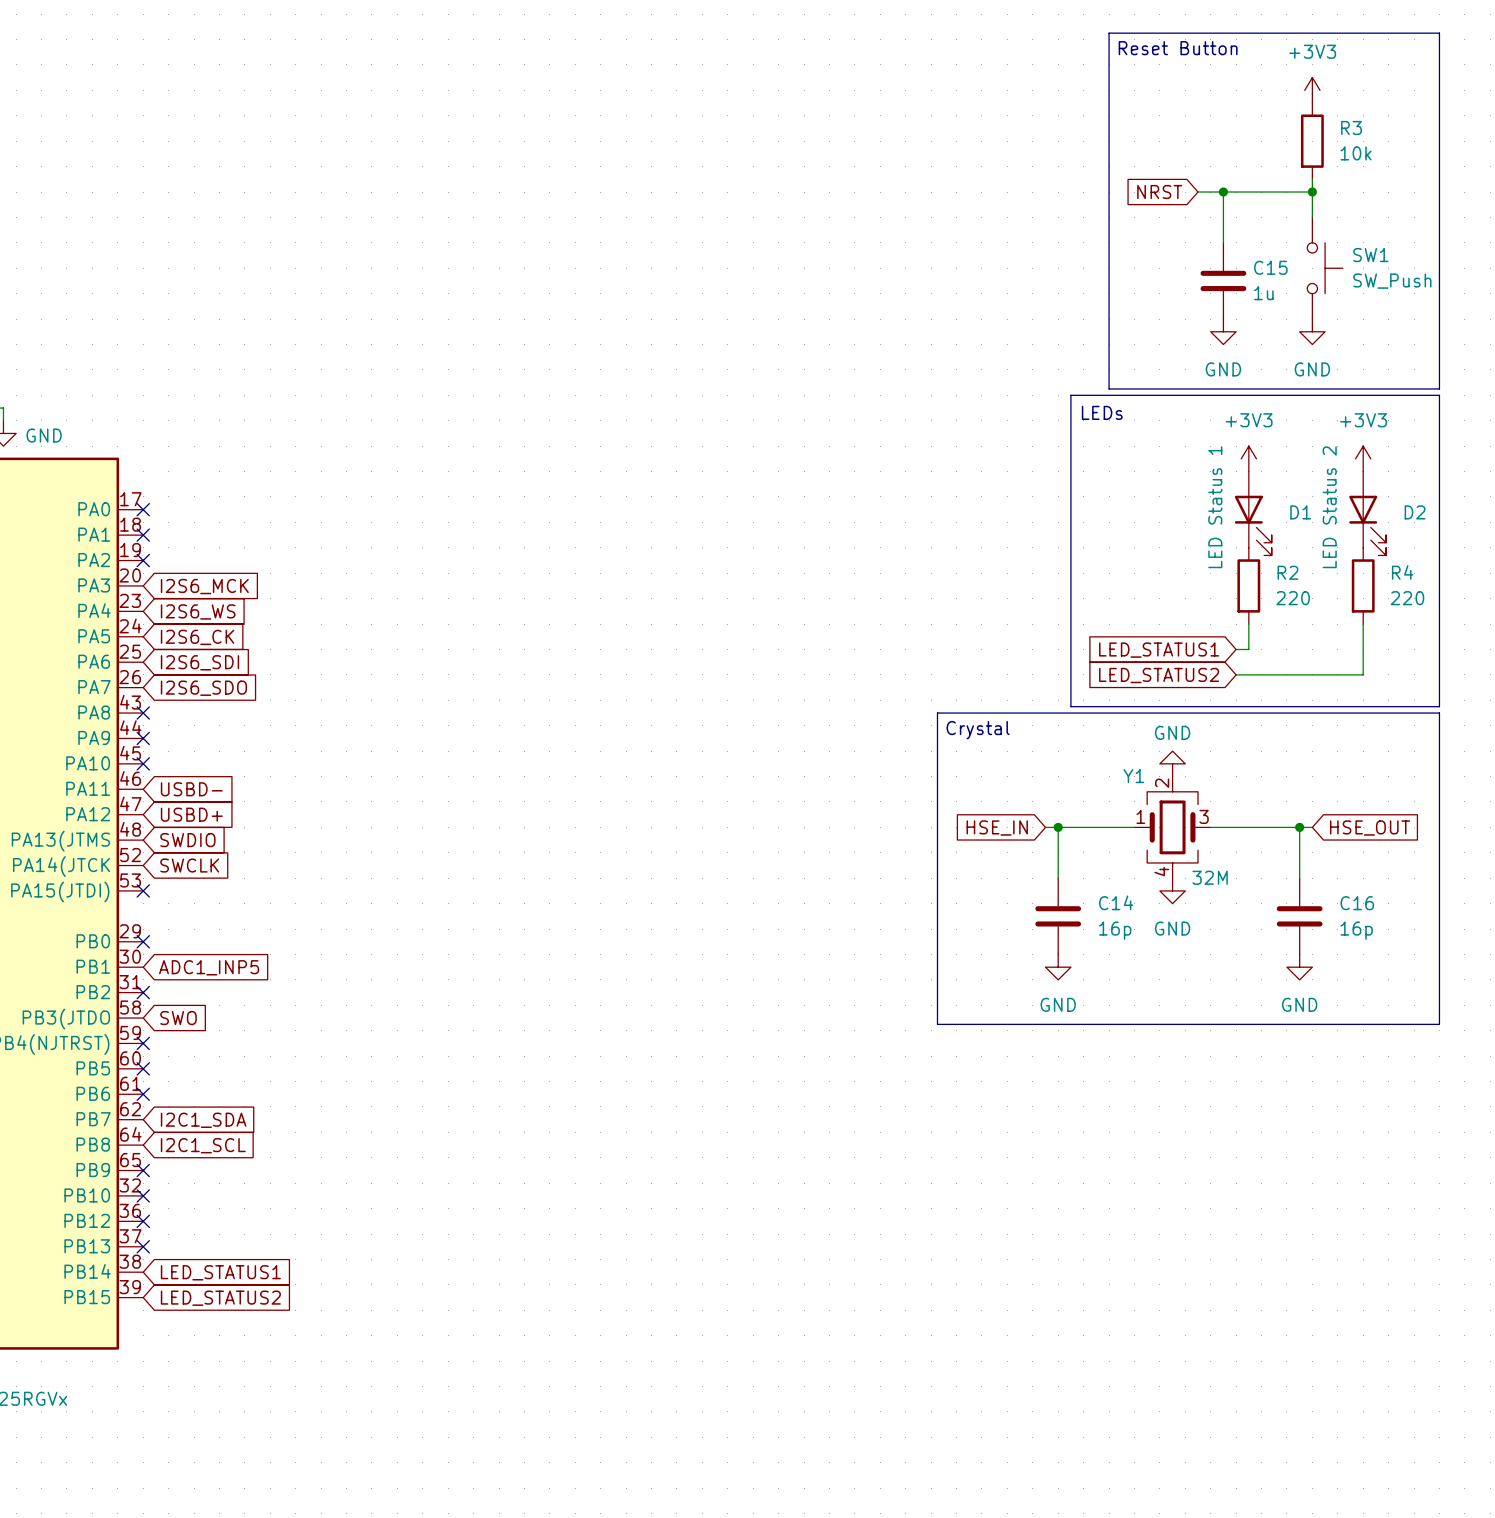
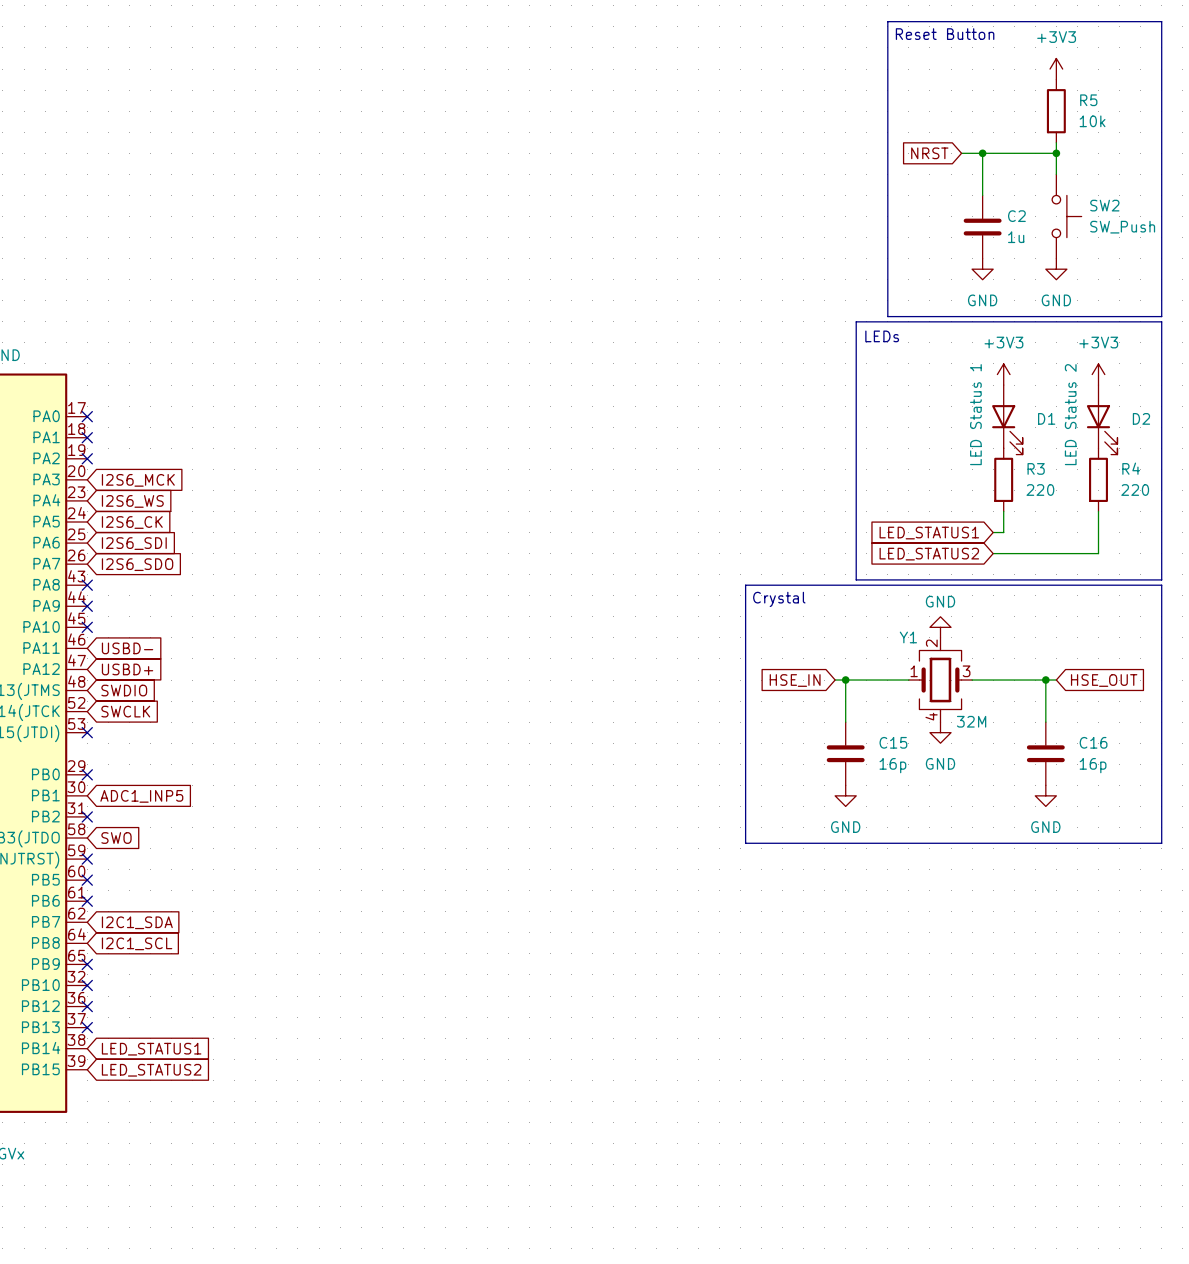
R3 name: R3 (1351, 127) -> R5 (1088, 100)
SW1 name: SW1 (1370, 255) -> SW2 (1104, 205)
C15 name: C15 (1270, 267) -> C2 (1016, 216)
R2 name: R2 (1287, 572) -> R3 (1036, 468)
C14 name: C14 (1116, 902) -> C15 (893, 742)

